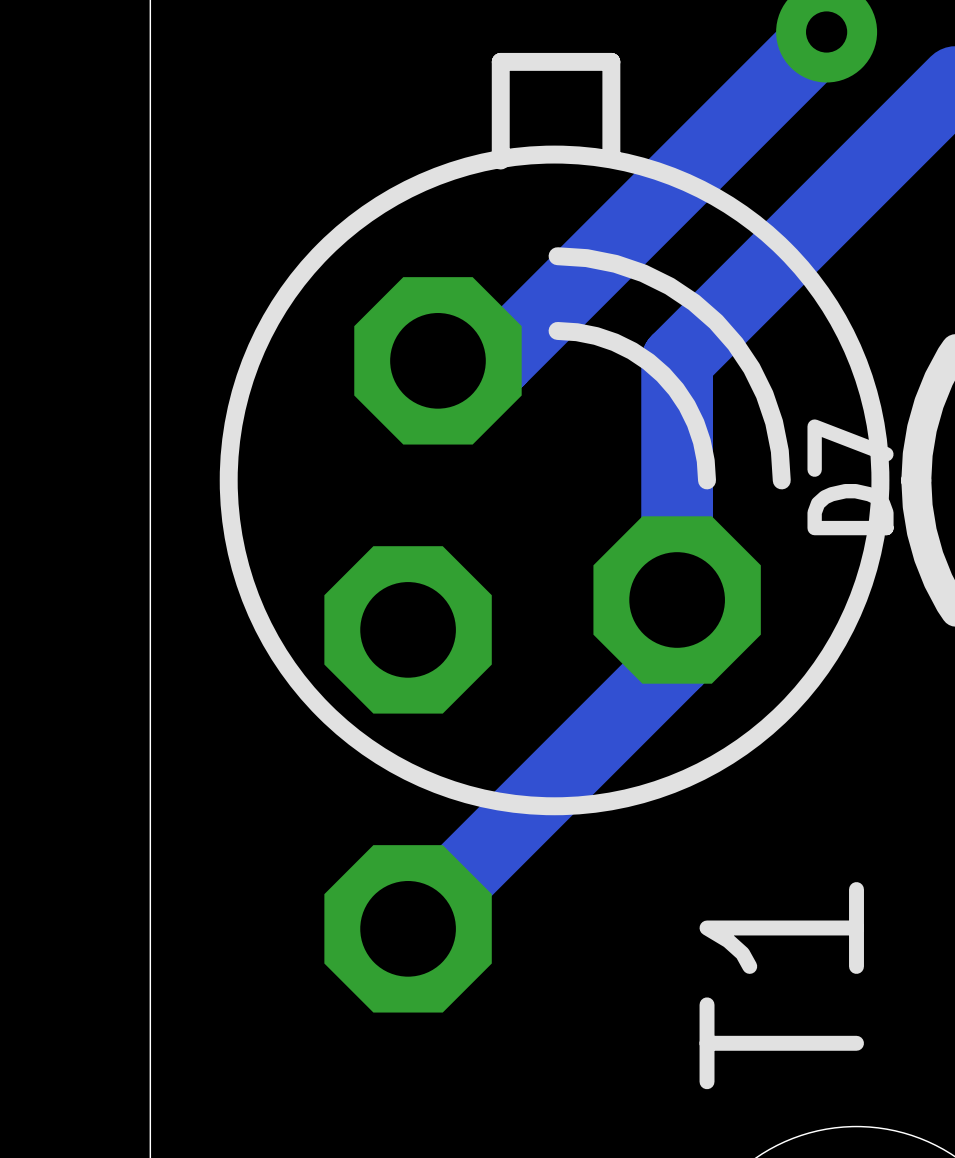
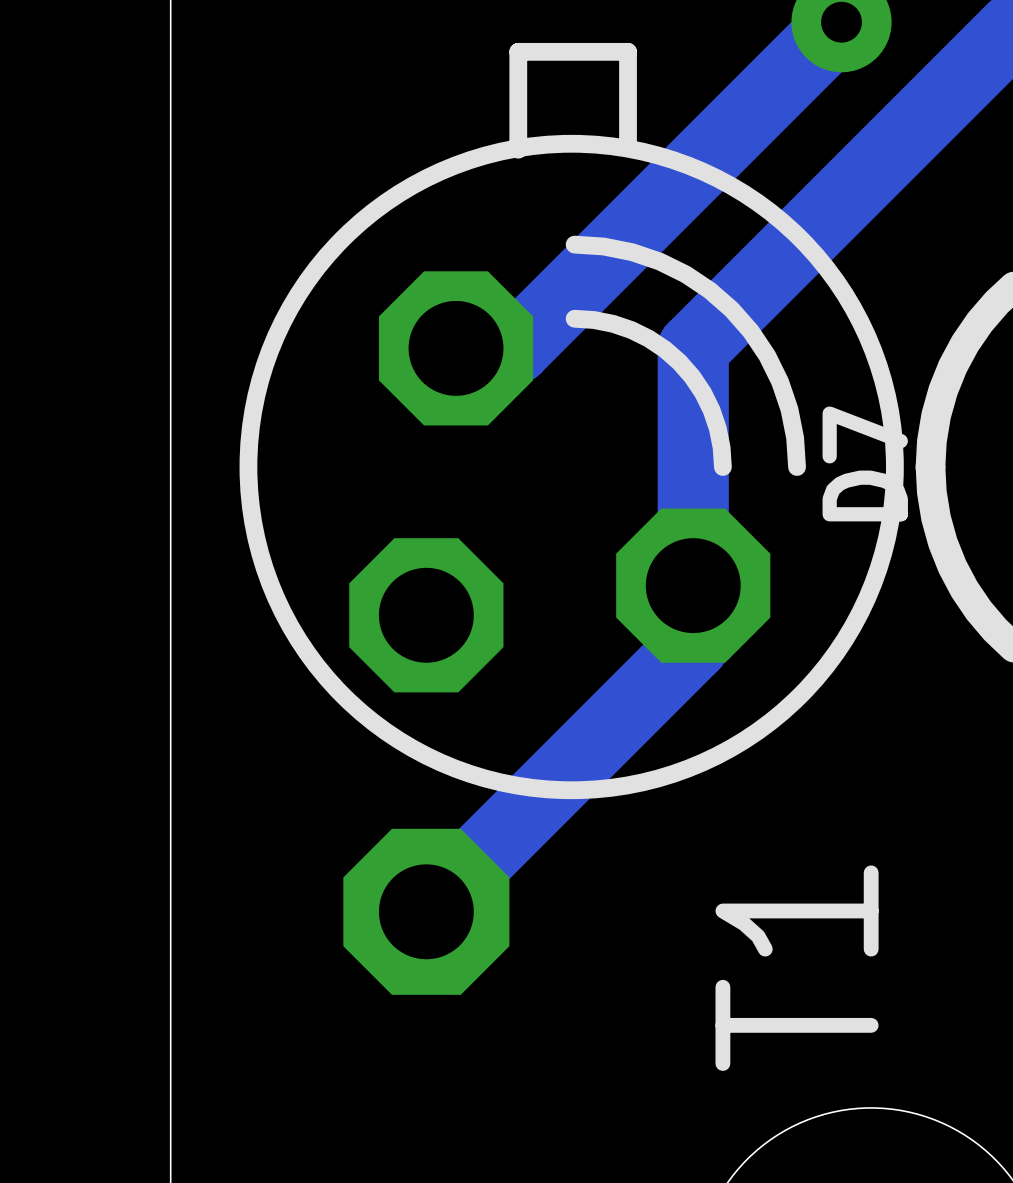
T1 footprint: [219, 52, 890, 816] -> [239, 42, 904, 800]

